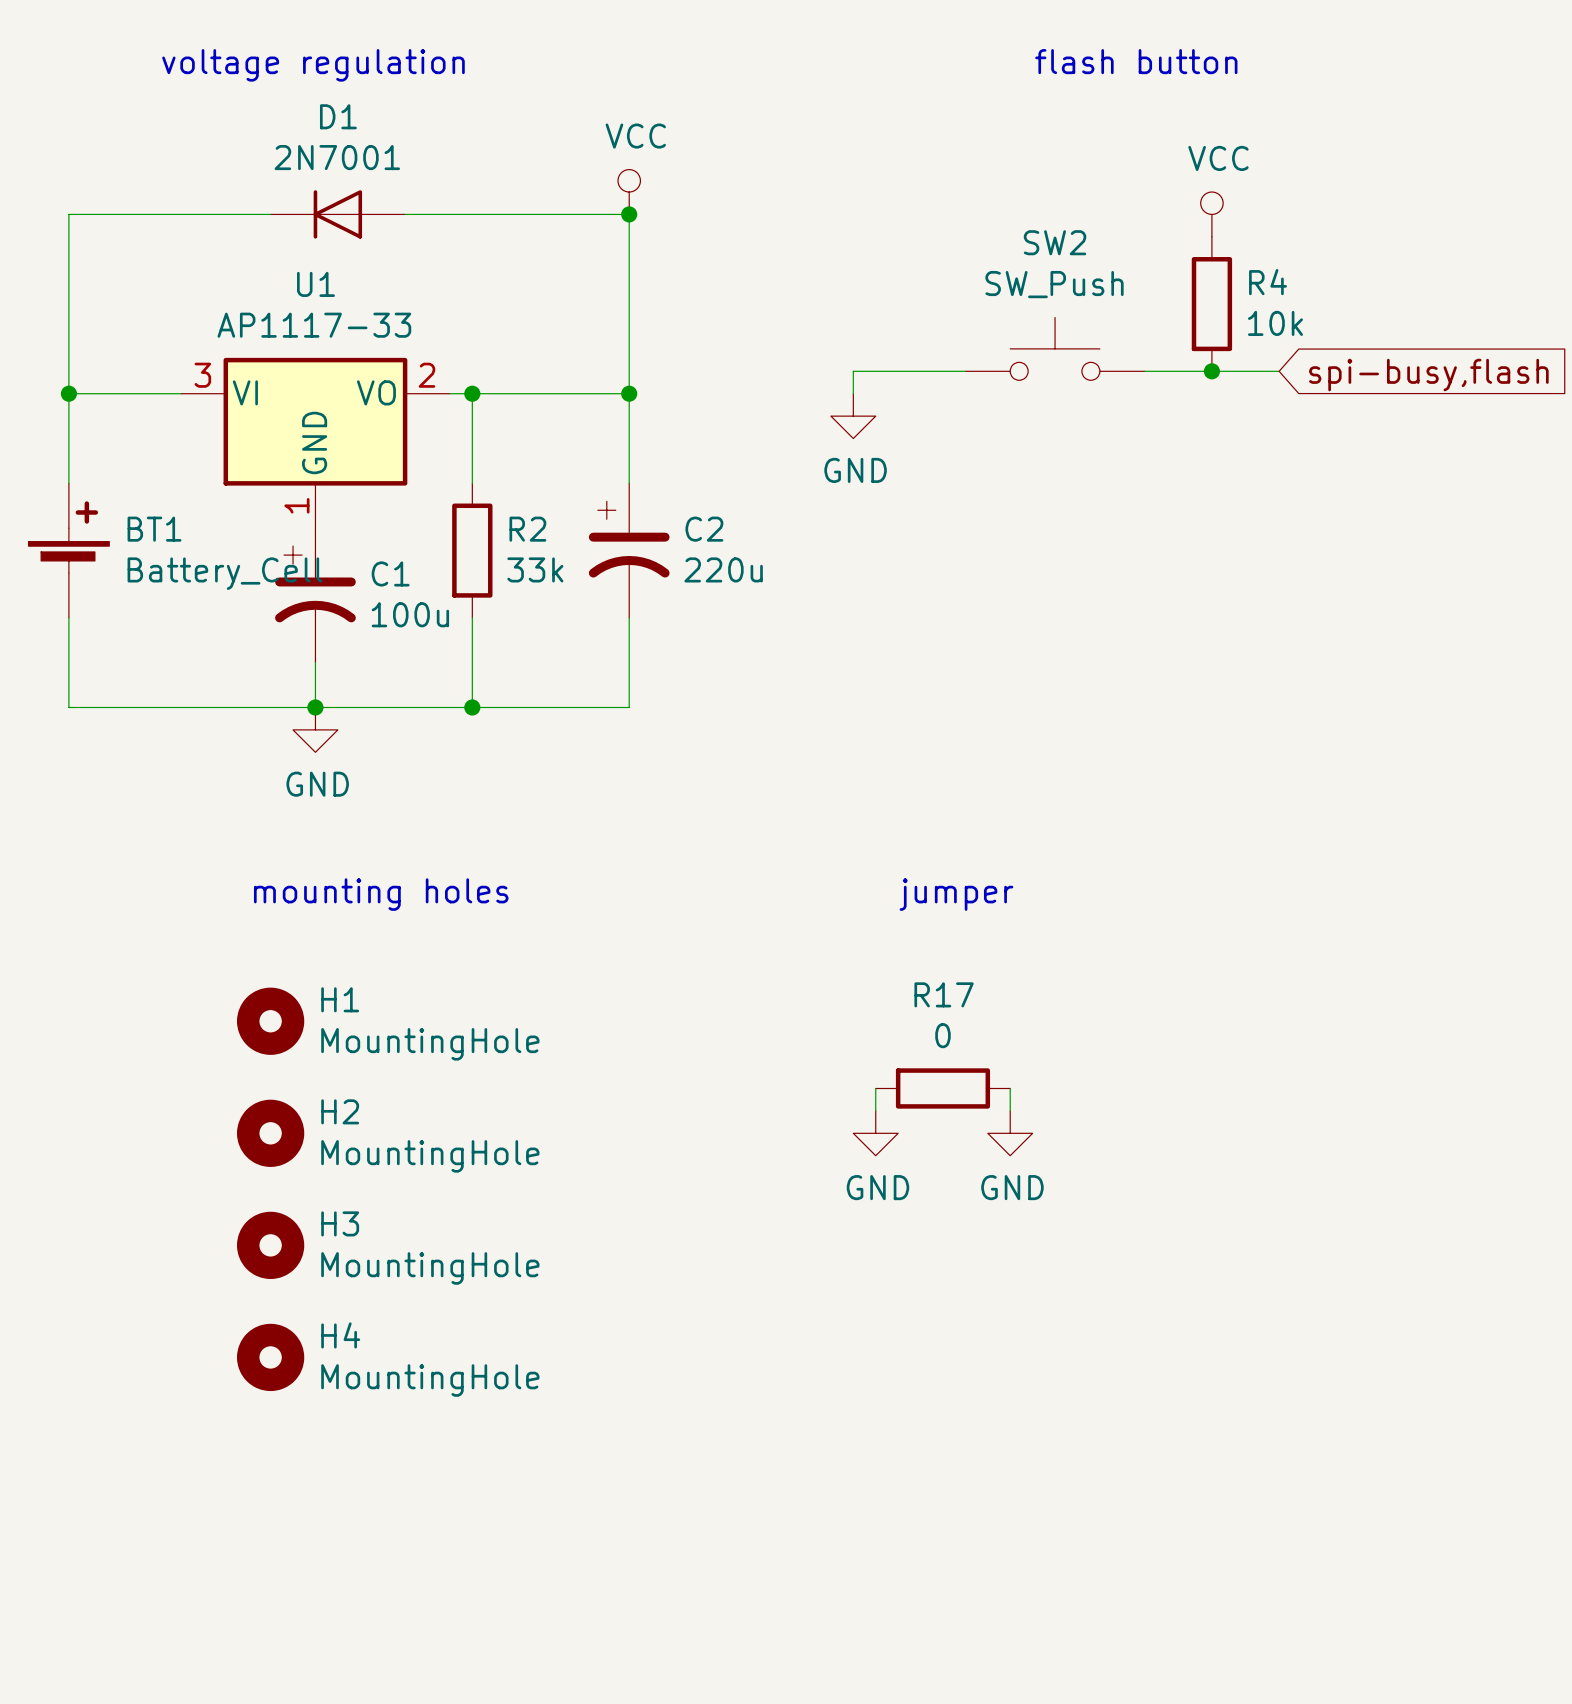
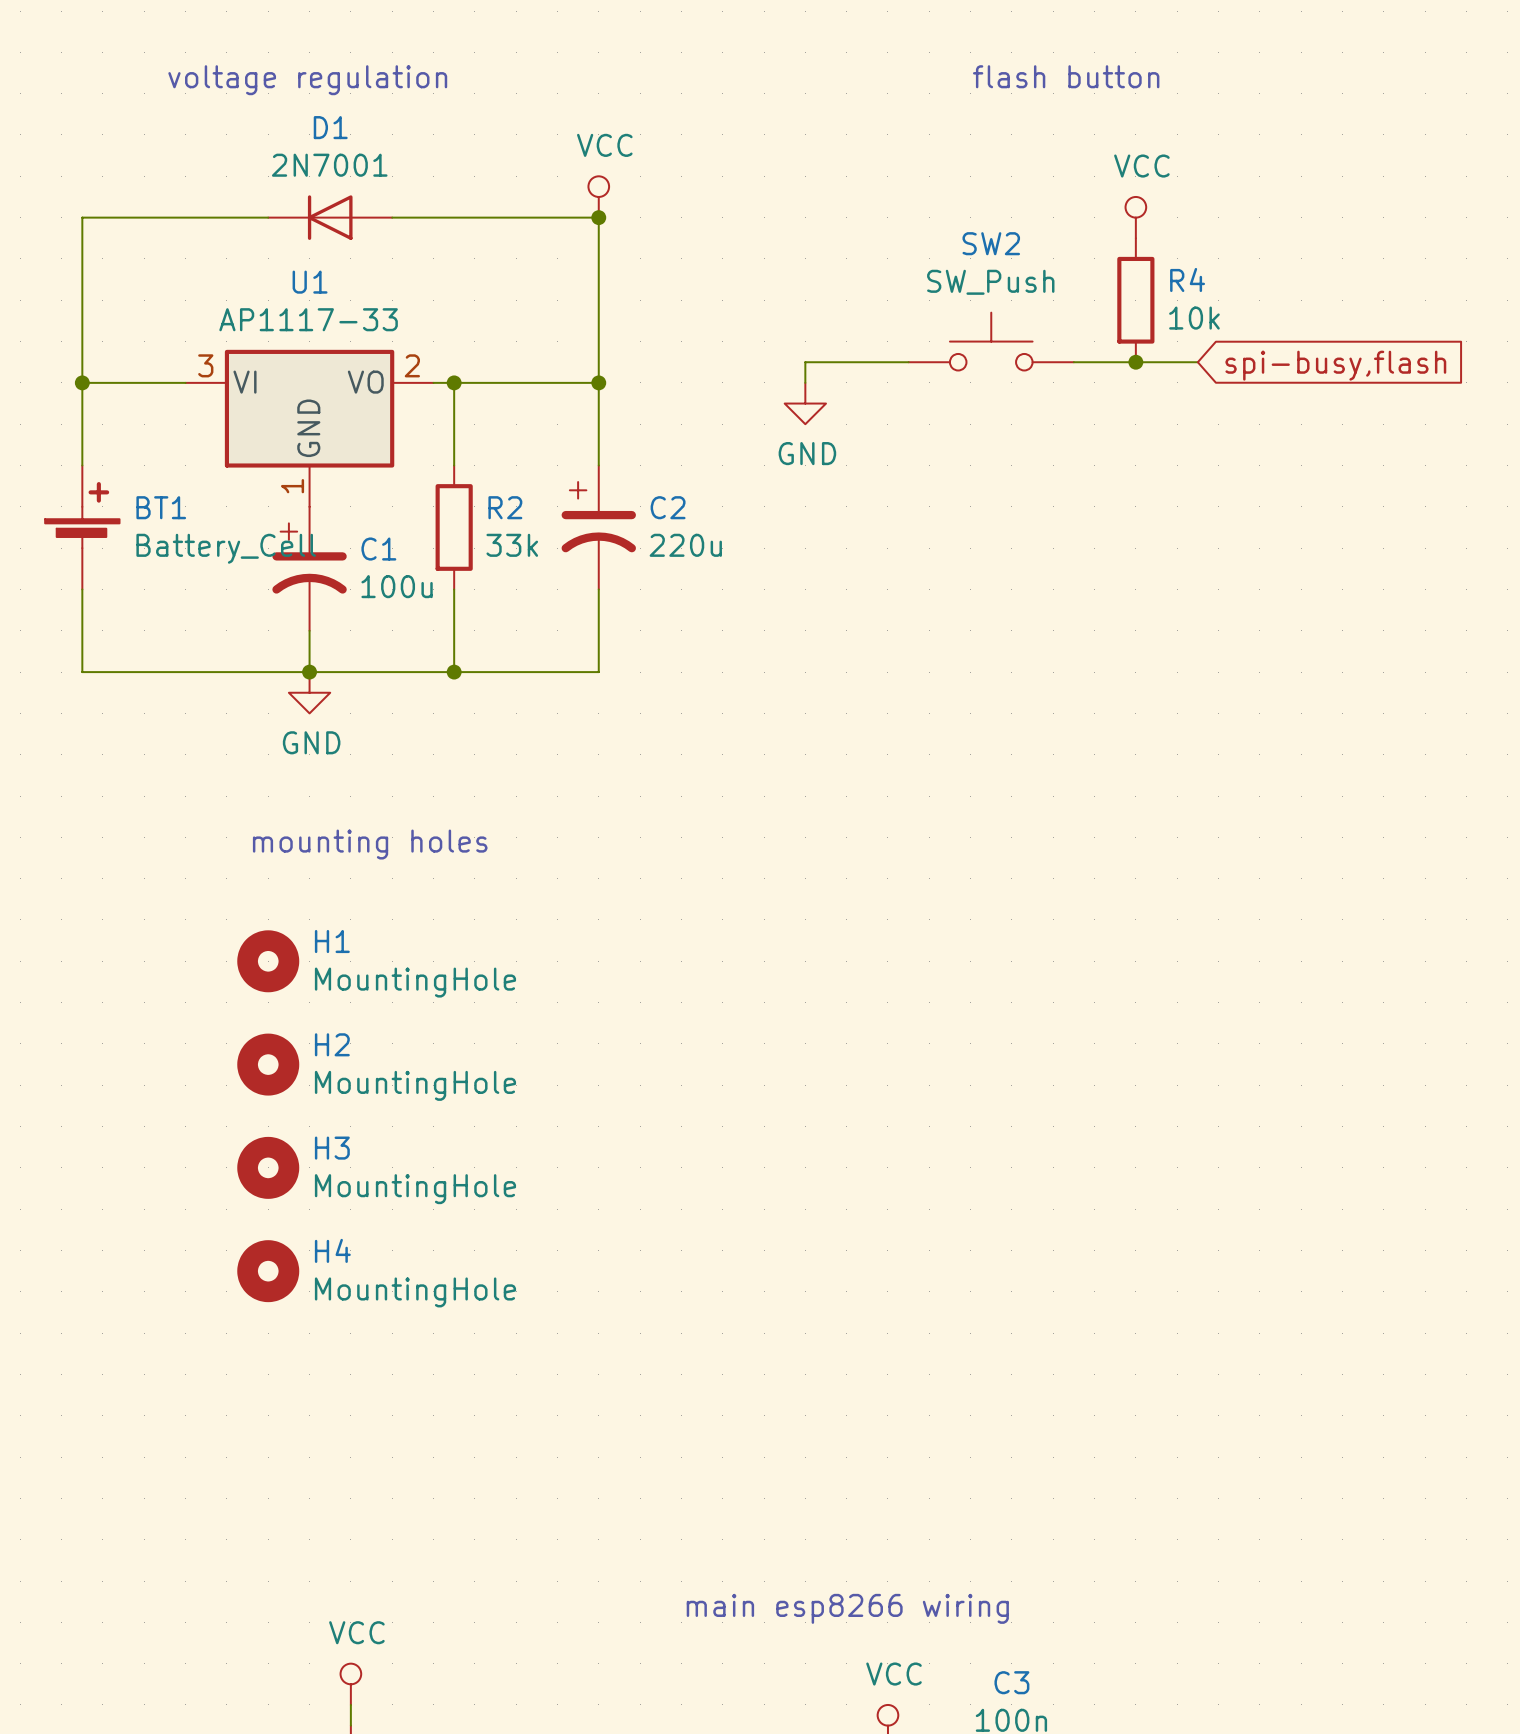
text: jumper (956, 894) -> none
wire: (875, 1088) (875, 1110) -> none
R17: 0 (942, 1088) -> none
wire: (1010, 1088) (1010, 1110) -> none
power symbol: GND (875, 1133) -> none
power symbol: GND (1010, 1133) -> none

